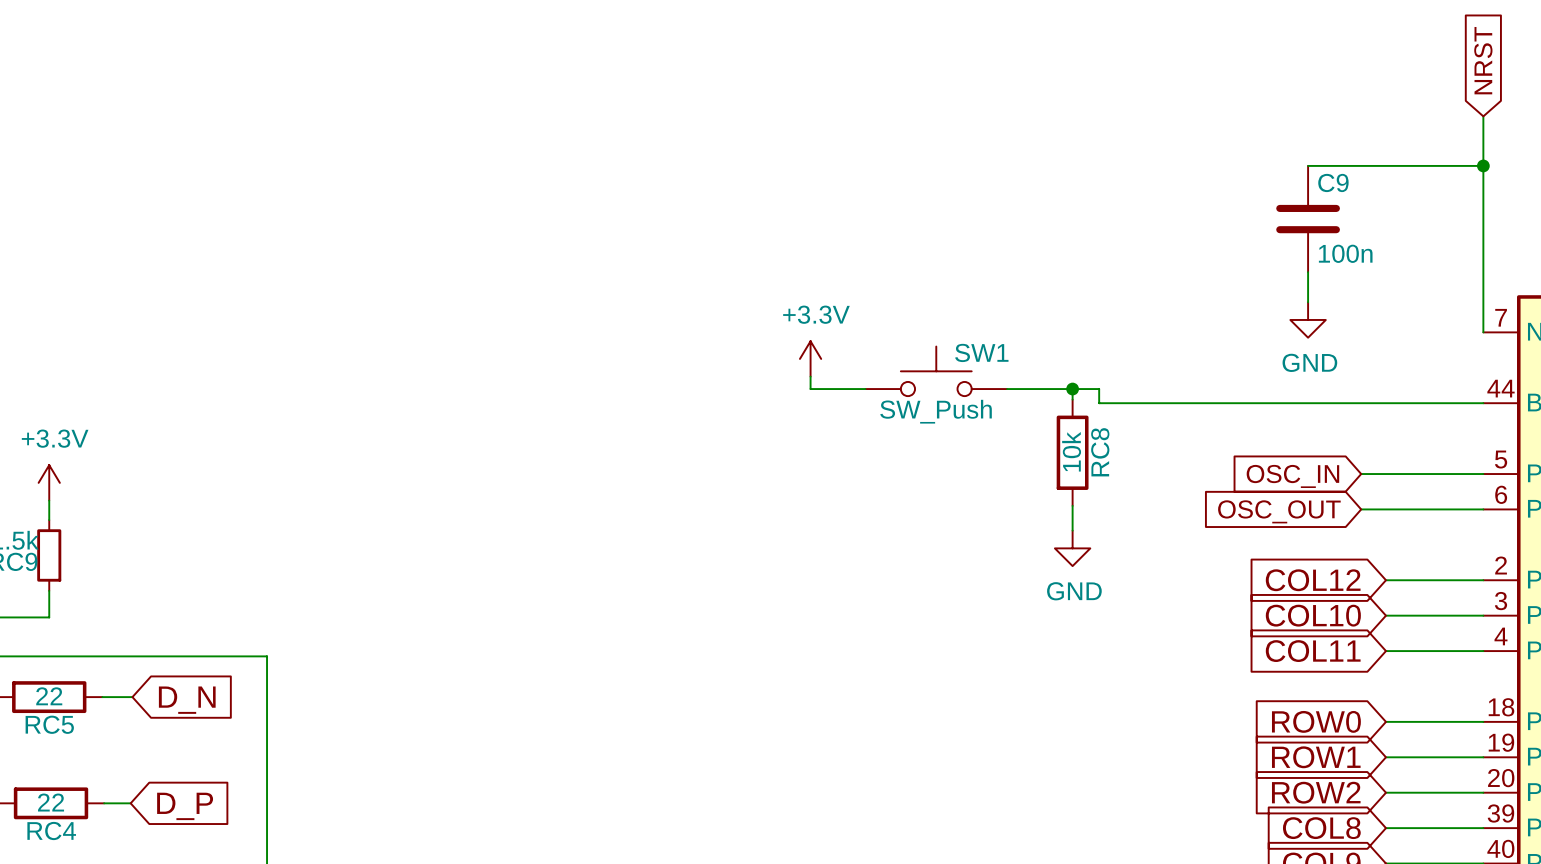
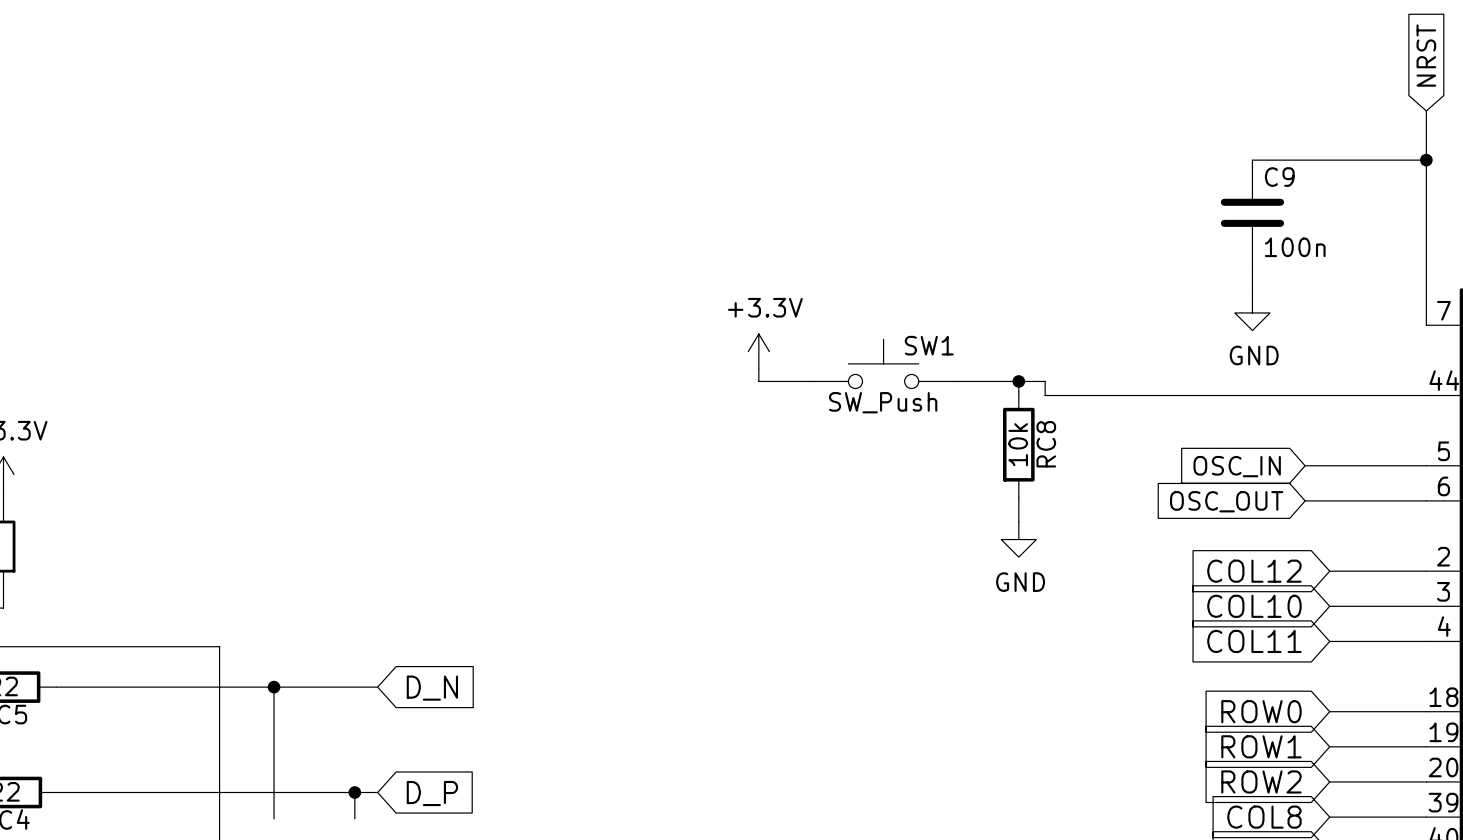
wire: none -> (86, 687) (377, 687)
wire: none -> (274, 687) (274, 818)
junction: none -> (274, 687)
global label position: D_N (187, 700) -> D_N (432, 688)
wire: none -> (84, 792) (377, 792)
wire: none -> (354, 792) (354, 818)
junction: none -> (354, 792)
global label position: D_P (185, 806) -> D_P (432, 793)

